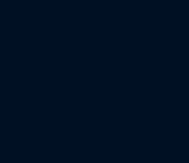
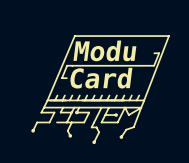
text: none -> Modu (104, 50)
line: none -> (154, 53) (159, 53) (154, 65)
line: none -> (153, 65) (67, 65) (62, 78) (66, 78)
text: none -> Card (101, 78)
line: none -> (57, 95) (55, 100)
line: none -> (64, 95) (62, 100)
line: none -> (72, 95) (69, 100)
line: none -> (79, 95) (77, 100)
line: none -> (87, 95) (84, 100)
line: none -> (94, 95) (92, 100)
line: none -> (102, 95) (99, 100)
line: none -> (109, 95) (107, 100)
line: none -> (116, 95) (114, 100)
line: none -> (124, 95) (121, 100)
line: none -> (131, 95) (129, 100)
line: none -> (139, 95) (136, 100)
line: none -> (47, 100) (144, 100)
line: none -> (47, 100) (74, 36) (168, 36) (144, 100)
line: none -> (47, 100) (43, 107)
line: none -> (144, 100) (141, 107) (43, 107)
line: none -> (43, 107) (41, 112) (54, 112) (49, 122) (37, 122) (33, 130)
line: none -> (63, 107) (60, 112) (71, 112)
line: none -> (74, 107) (71, 112)
line: none -> (79, 107) (76, 112) (89, 112) (84, 122)
line: none -> (101, 107) (91, 127) (96, 127) (99, 132) (94, 142)
line: none -> (108, 107) (101, 122) (117, 122) (125, 107) (128, 115) (141, 107) (133, 127) (126, 129) (121, 137)
drawing: none -> [75, 111, 79, 114]
line: none -> (71, 112) (66, 122)
drawing: none -> [114, 113, 118, 117]
line: none -> (105, 115) (116, 115)
line: none -> (56, 122) (84, 122)
line: none -> (71, 122) (67, 130)
drawing: none -> [31, 129, 35, 133]
line: none -> (67, 130) (70, 135)
drawing: none -> [68, 134, 72, 138]
drawing: none -> [119, 135, 123, 139]
drawing: none -> [92, 140, 96, 144]

